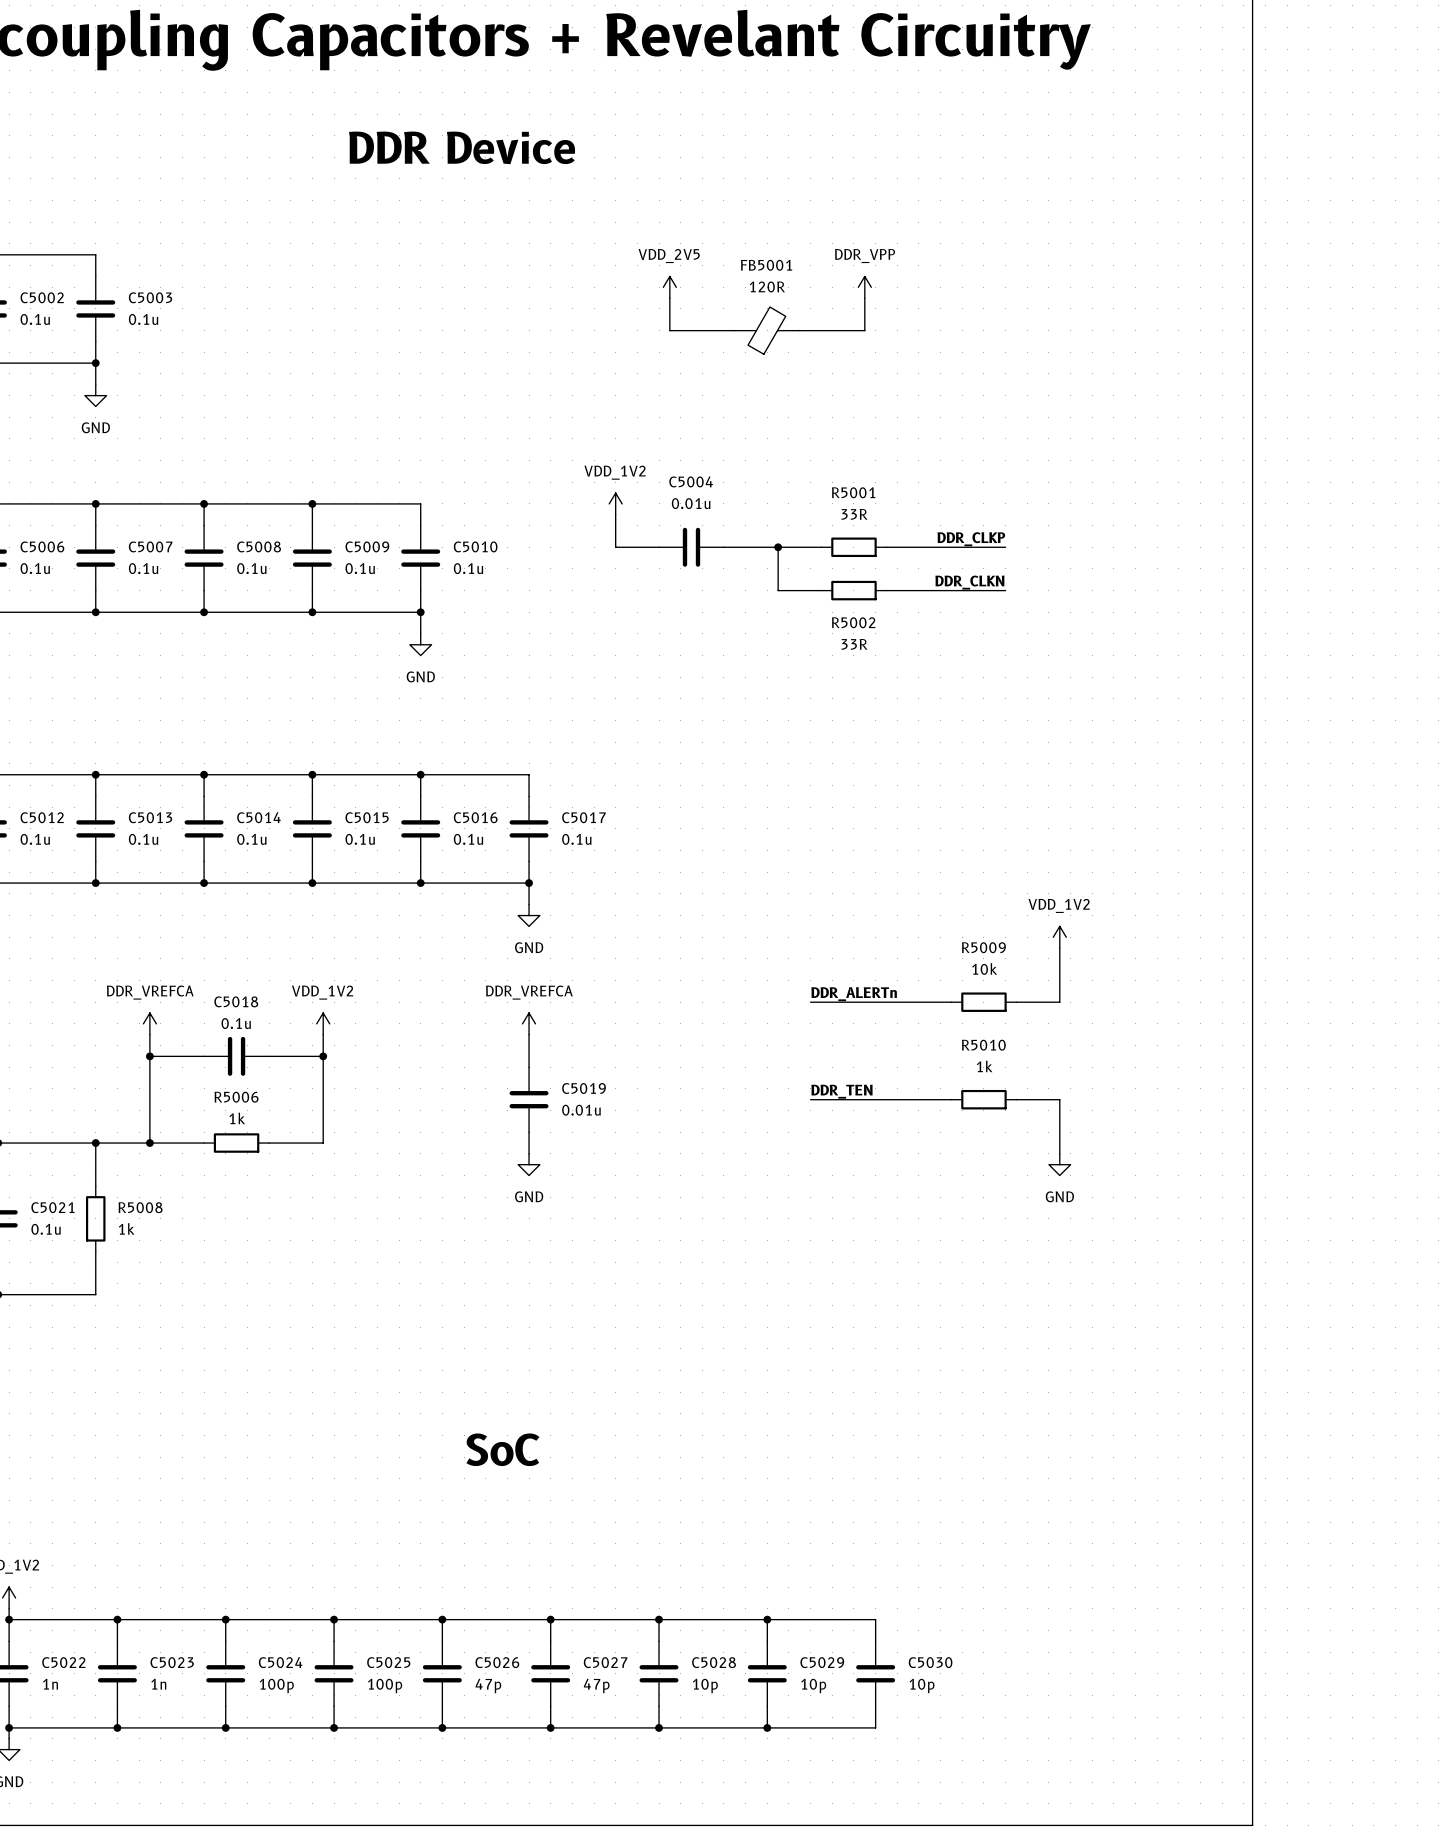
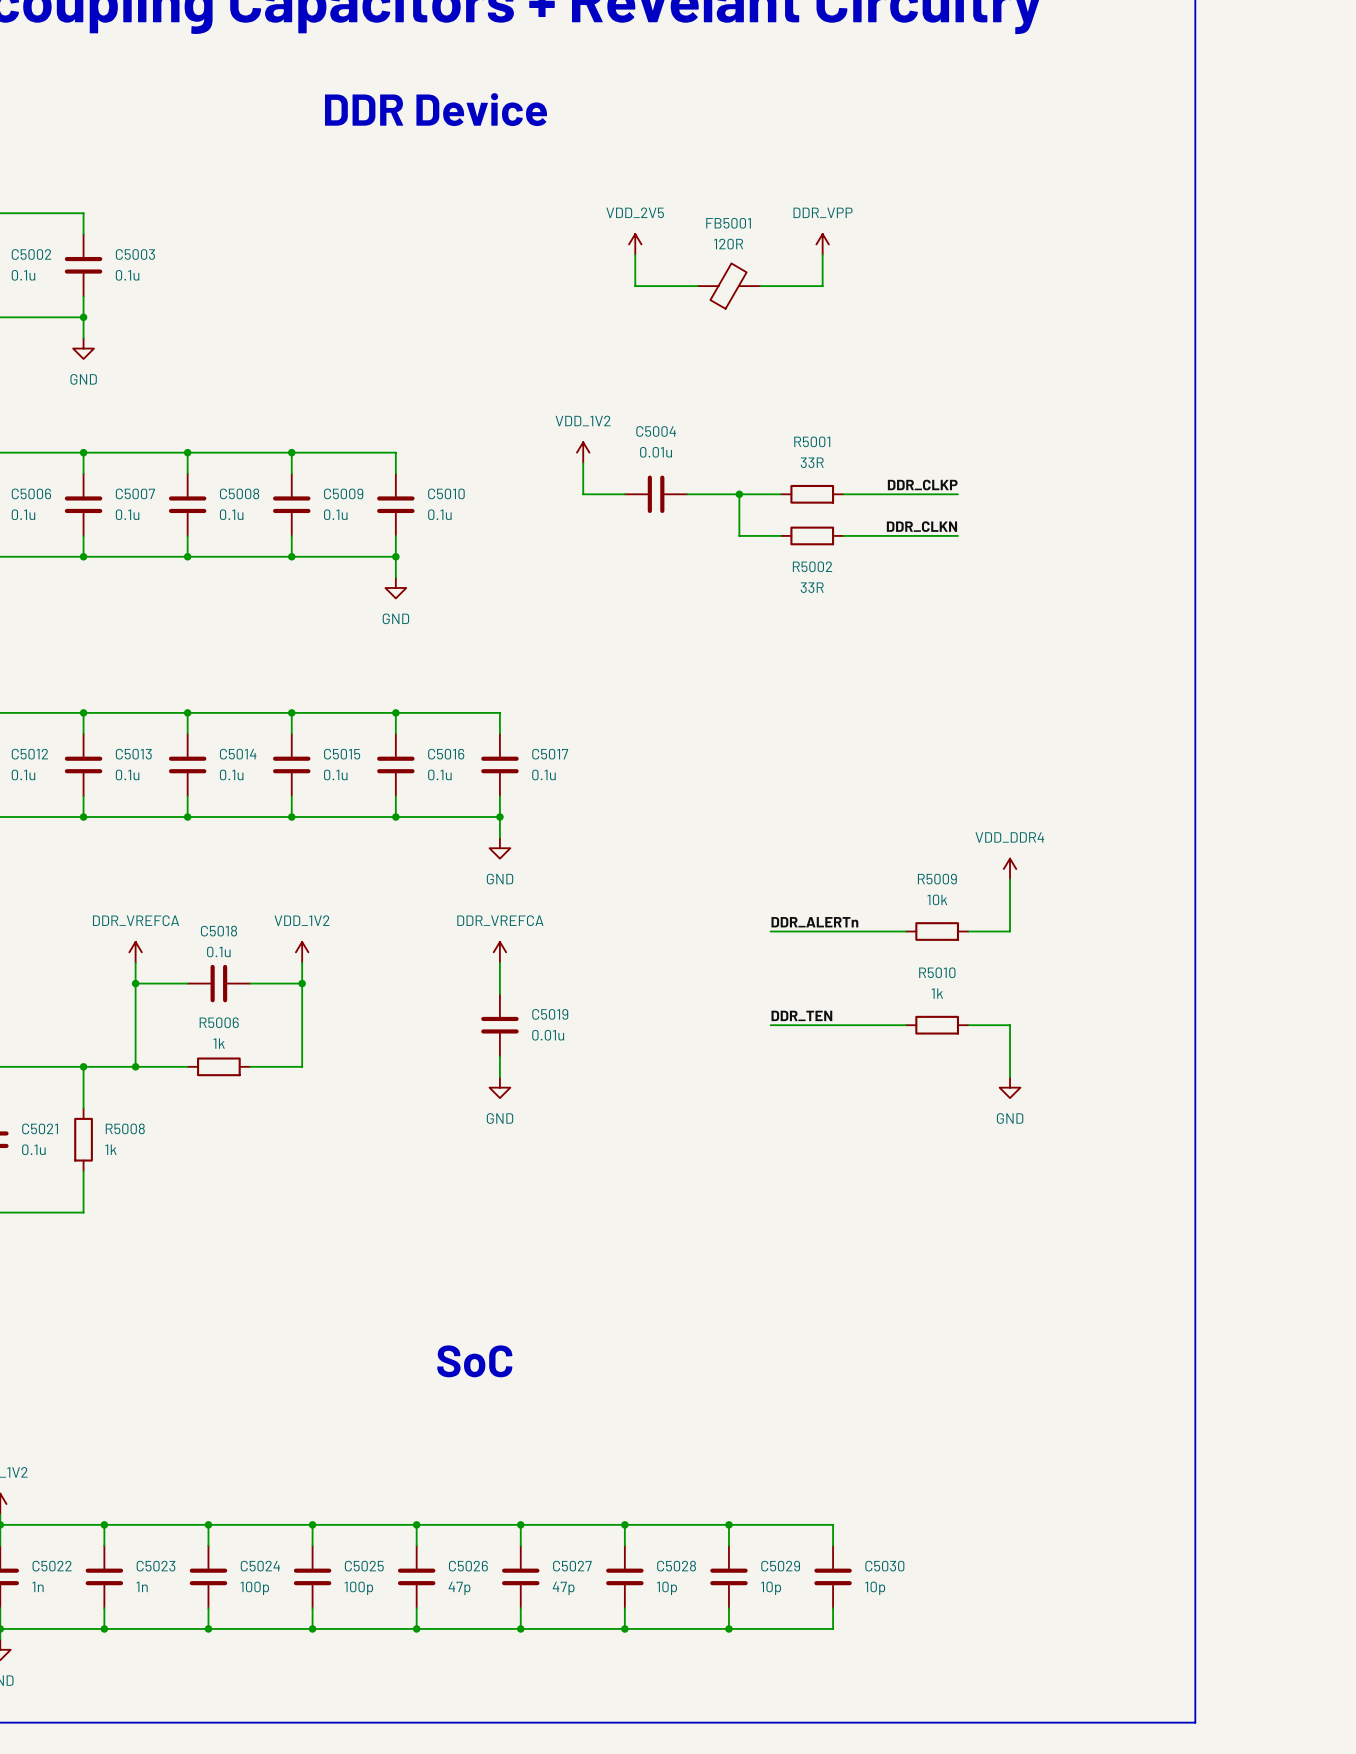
power symbol: VDD_1V2 (1059, 937) -> VDD_DDR4 (1010, 869)

